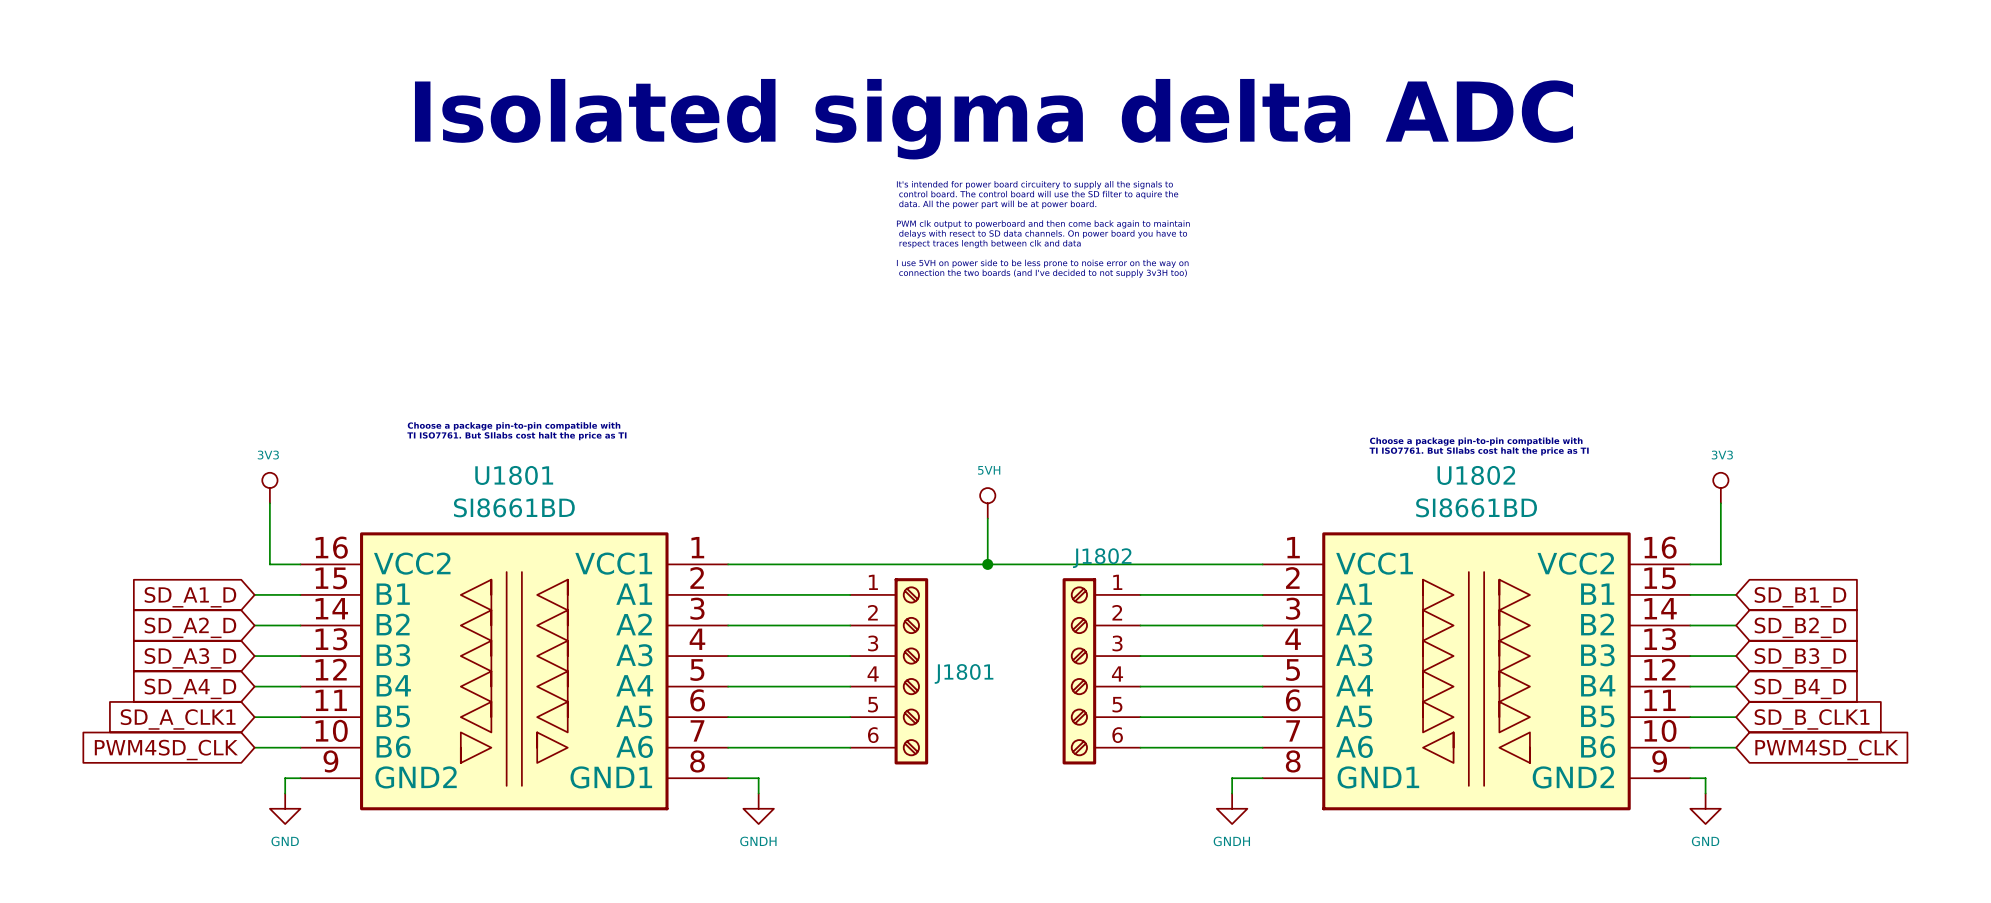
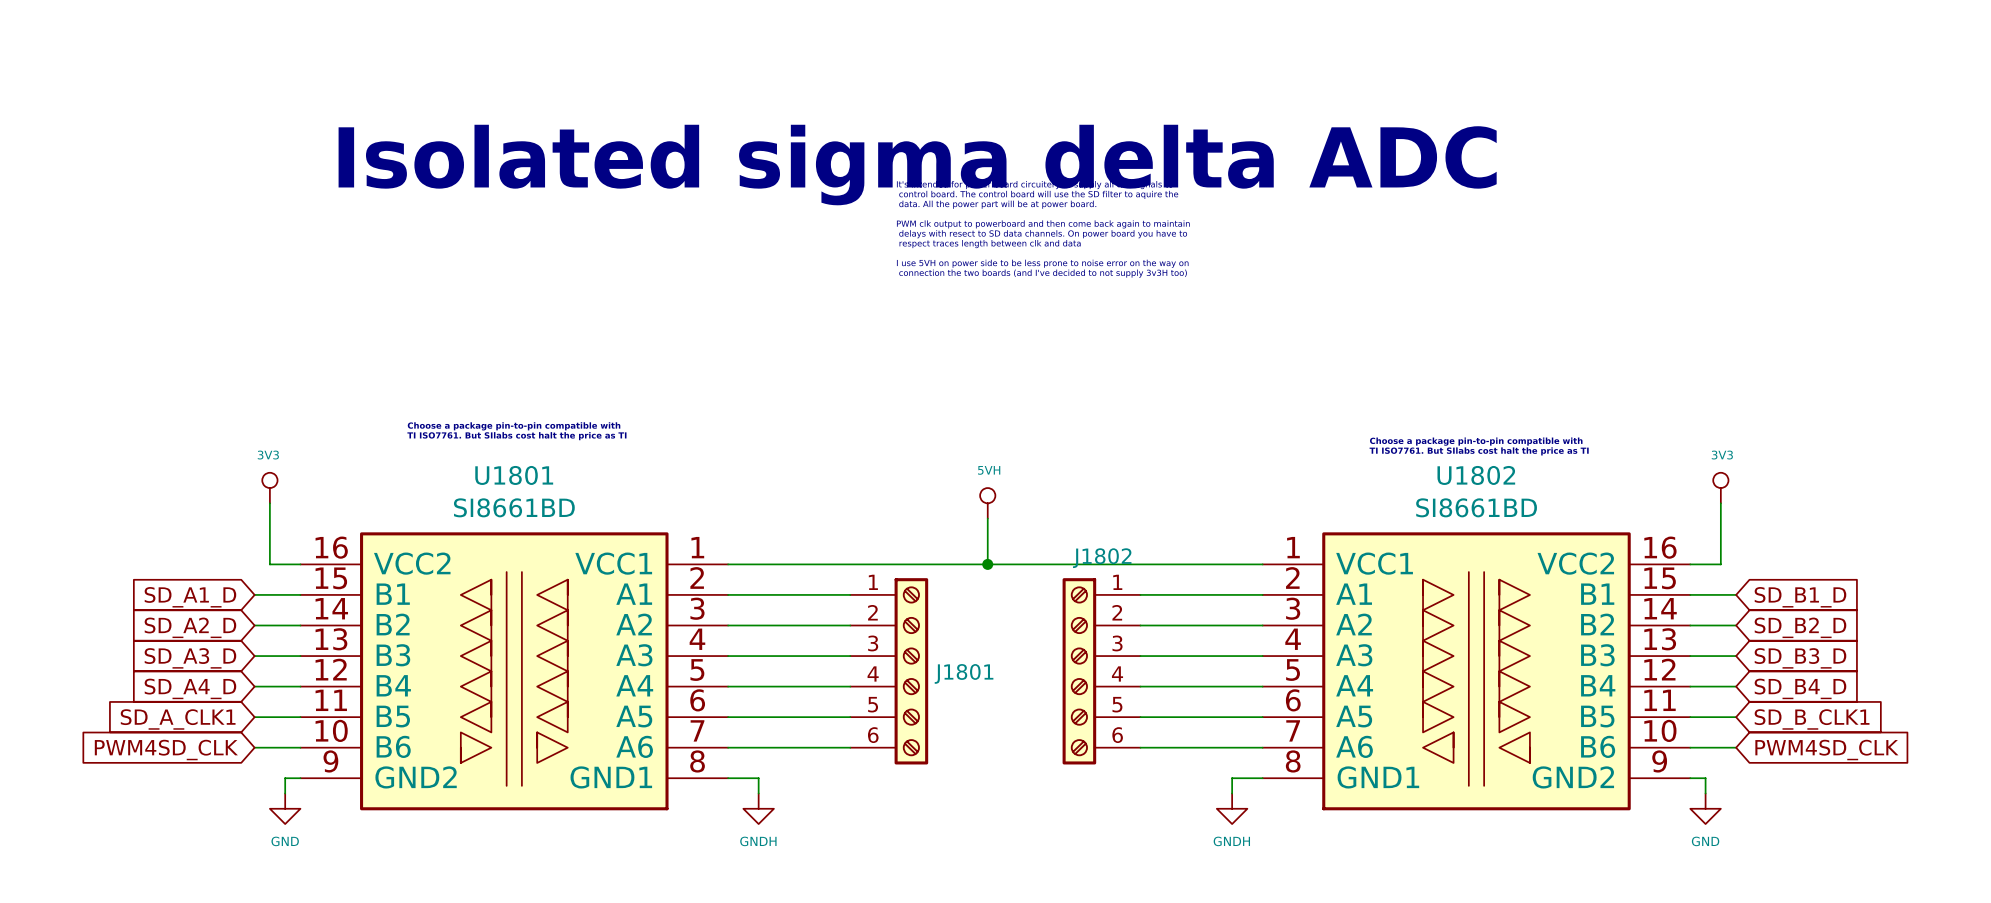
text position: Isolated sigma delta ADC (993, 119) -> Isolated sigma delta ADC (917, 165)

